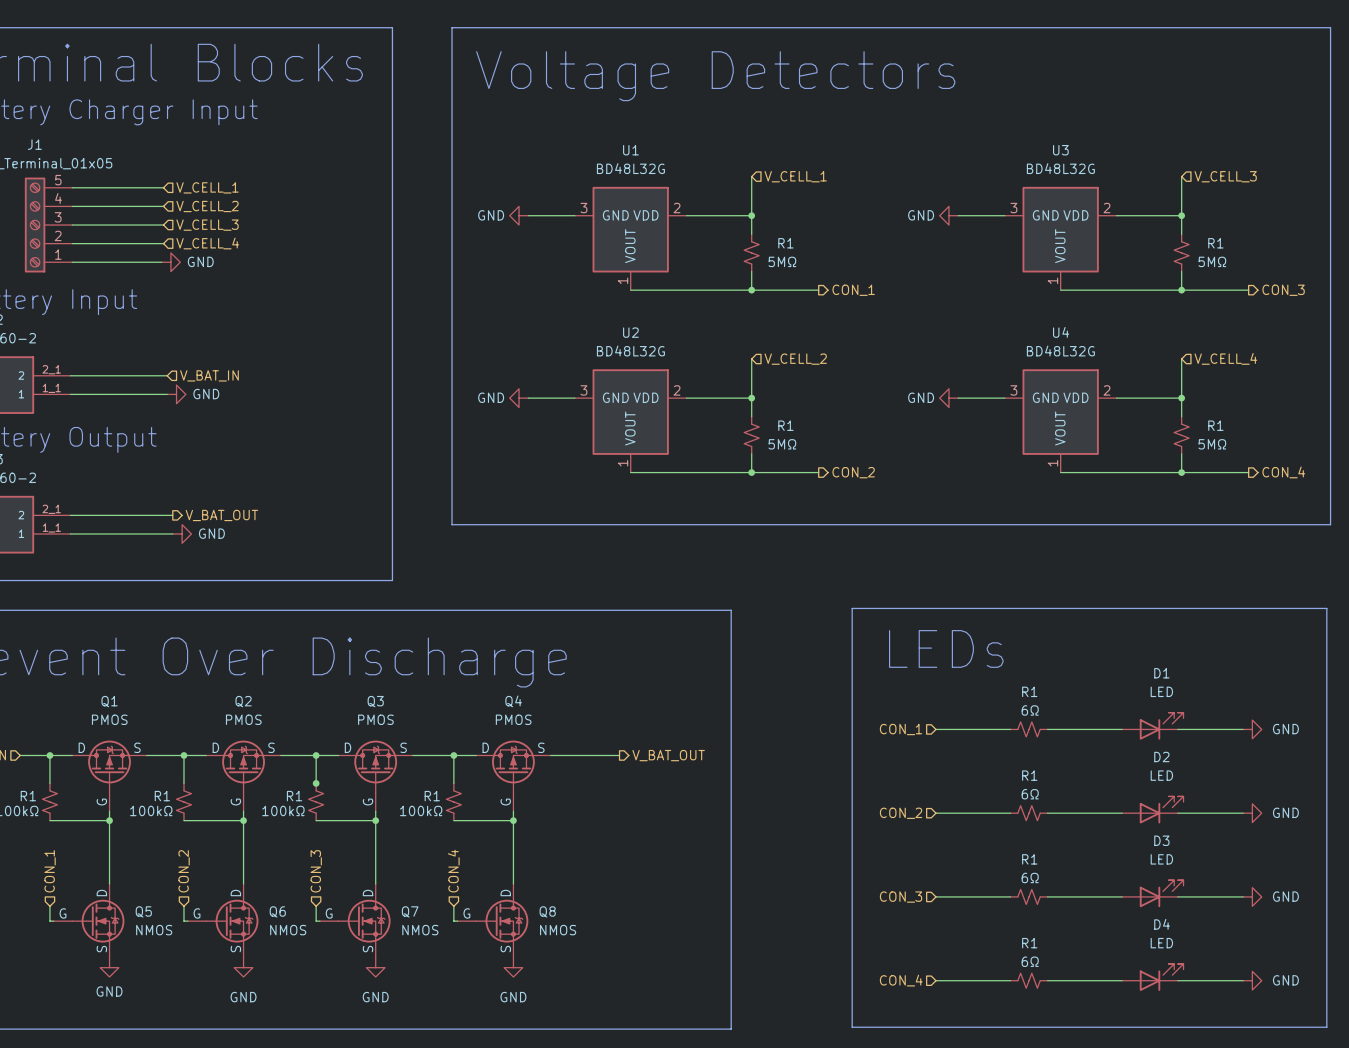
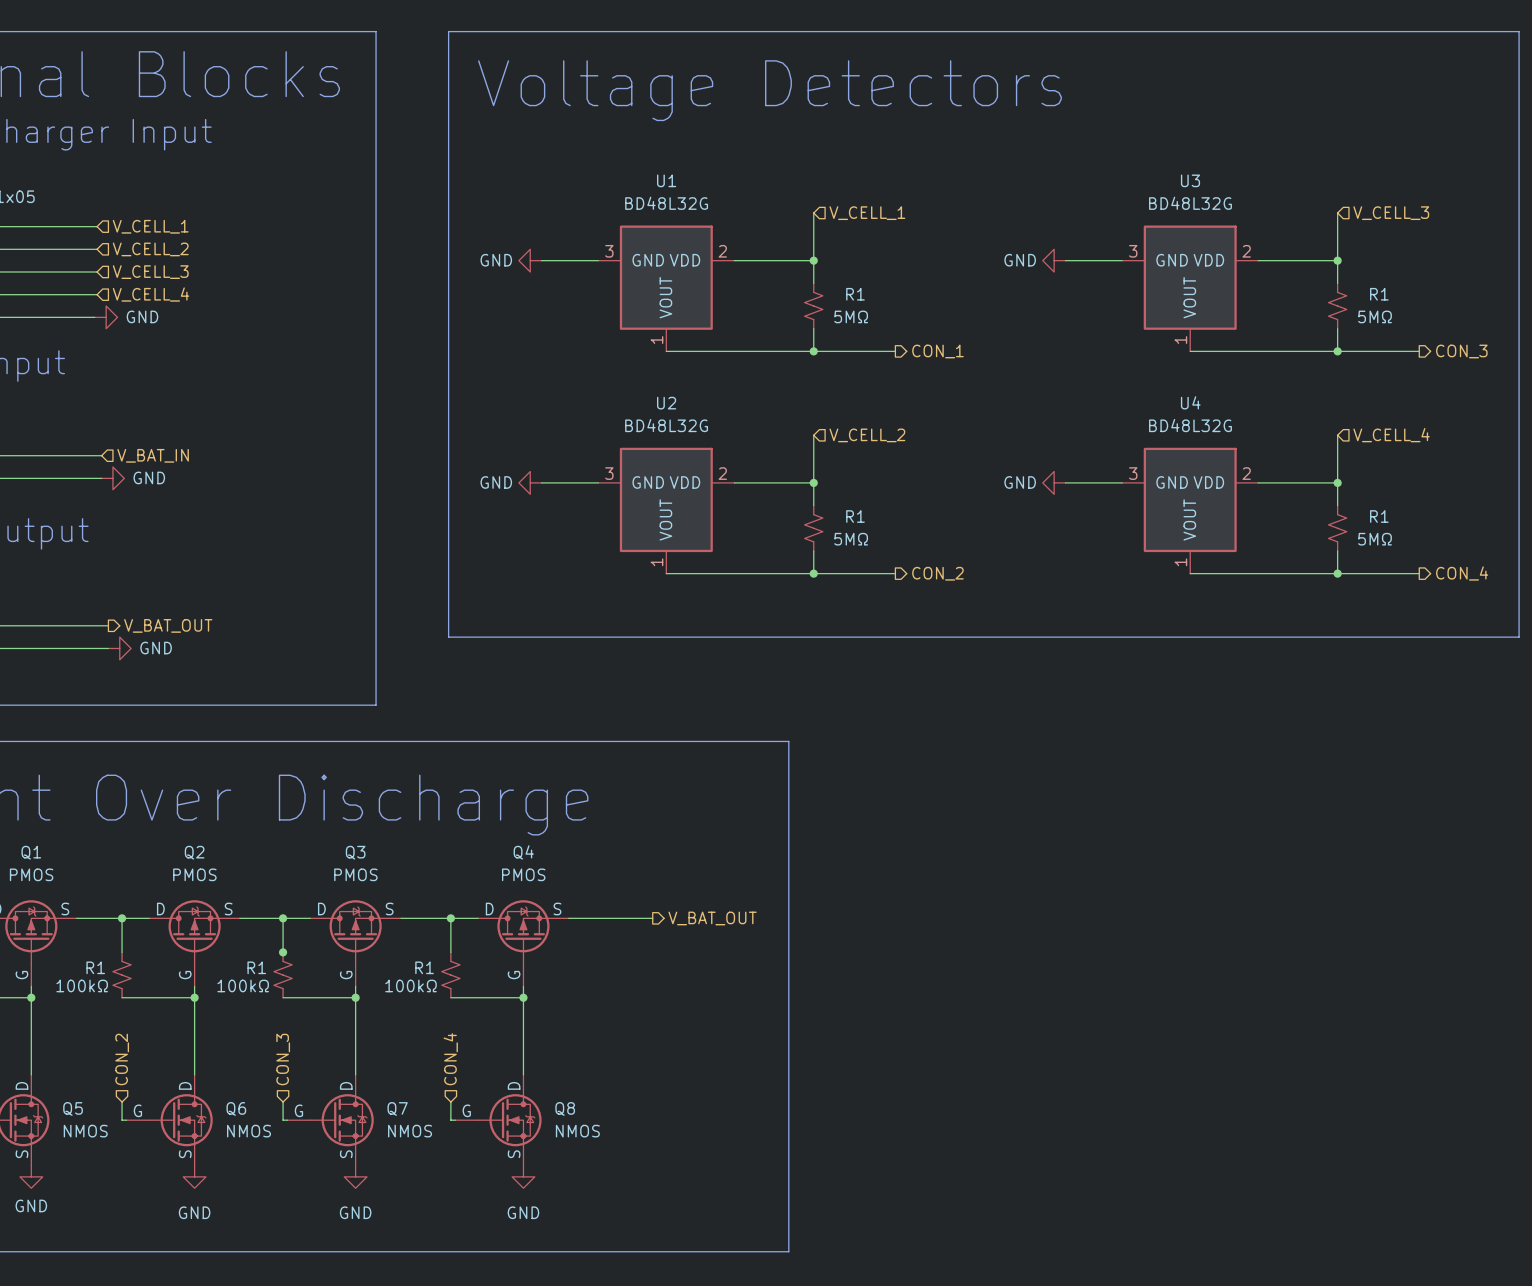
line: (852, 608) (1326, 608) (1326, 1027) (852, 1027) (852, 608) -> none
text: LEDs (946, 648) -> none
D1: LED (1152, 726) -> none
hierarchical label: CON_1 (901, 729) -> none
wire: (935, 729) (1010, 729) -> none
R1: 6Ω (1029, 729) -> none
wire: (1047, 729) (1122, 729) -> none
wire: (1177, 729) (1243, 729) -> none
power symbol: GND (1252, 729) -> none
D2: LED (1152, 809) -> none
hierarchical label: CON_2 (901, 813) -> none
wire: (935, 813) (1010, 813) -> none
R1: 6Ω (1029, 813) -> none
wire: (1047, 813) (1122, 813) -> none
wire: (1177, 813) (1243, 813) -> none
power symbol: GND (1252, 813) -> none
D3: LED (1152, 893) -> none
wire: (935, 896) (1010, 896) -> none
R1: 6Ω (1029, 896) -> none
wire: (1047, 896) (1122, 896) -> none
wire: (1177, 896) (1243, 896) -> none
power symbol: GND (1252, 896) -> none
hierarchical label: CON_3 (901, 897) -> none
D4: LED (1152, 977) -> none
hierarchical label: CON_4 (901, 980) -> none
wire: (935, 980) (1010, 980) -> none
R1: 6Ω (1029, 980) -> none
wire: (1047, 980) (1122, 980) -> none
wire: (1177, 980) (1243, 980) -> none
power symbol: GND (1252, 980) -> none

